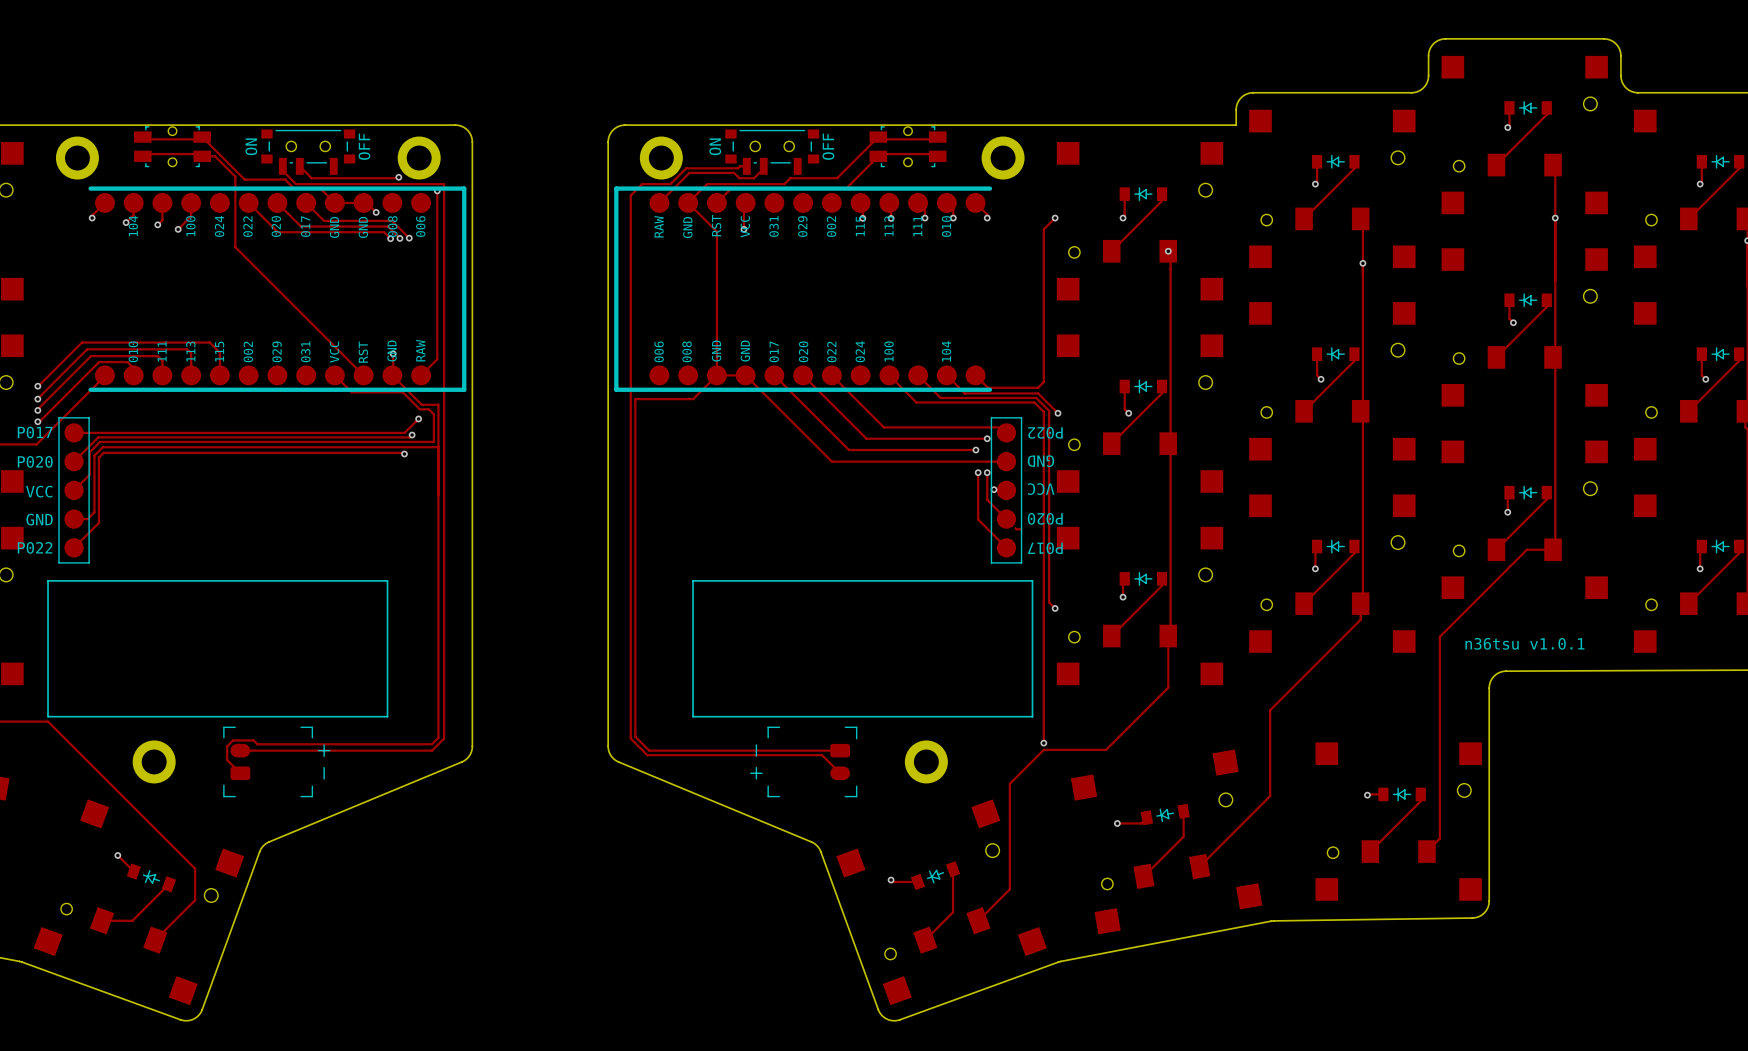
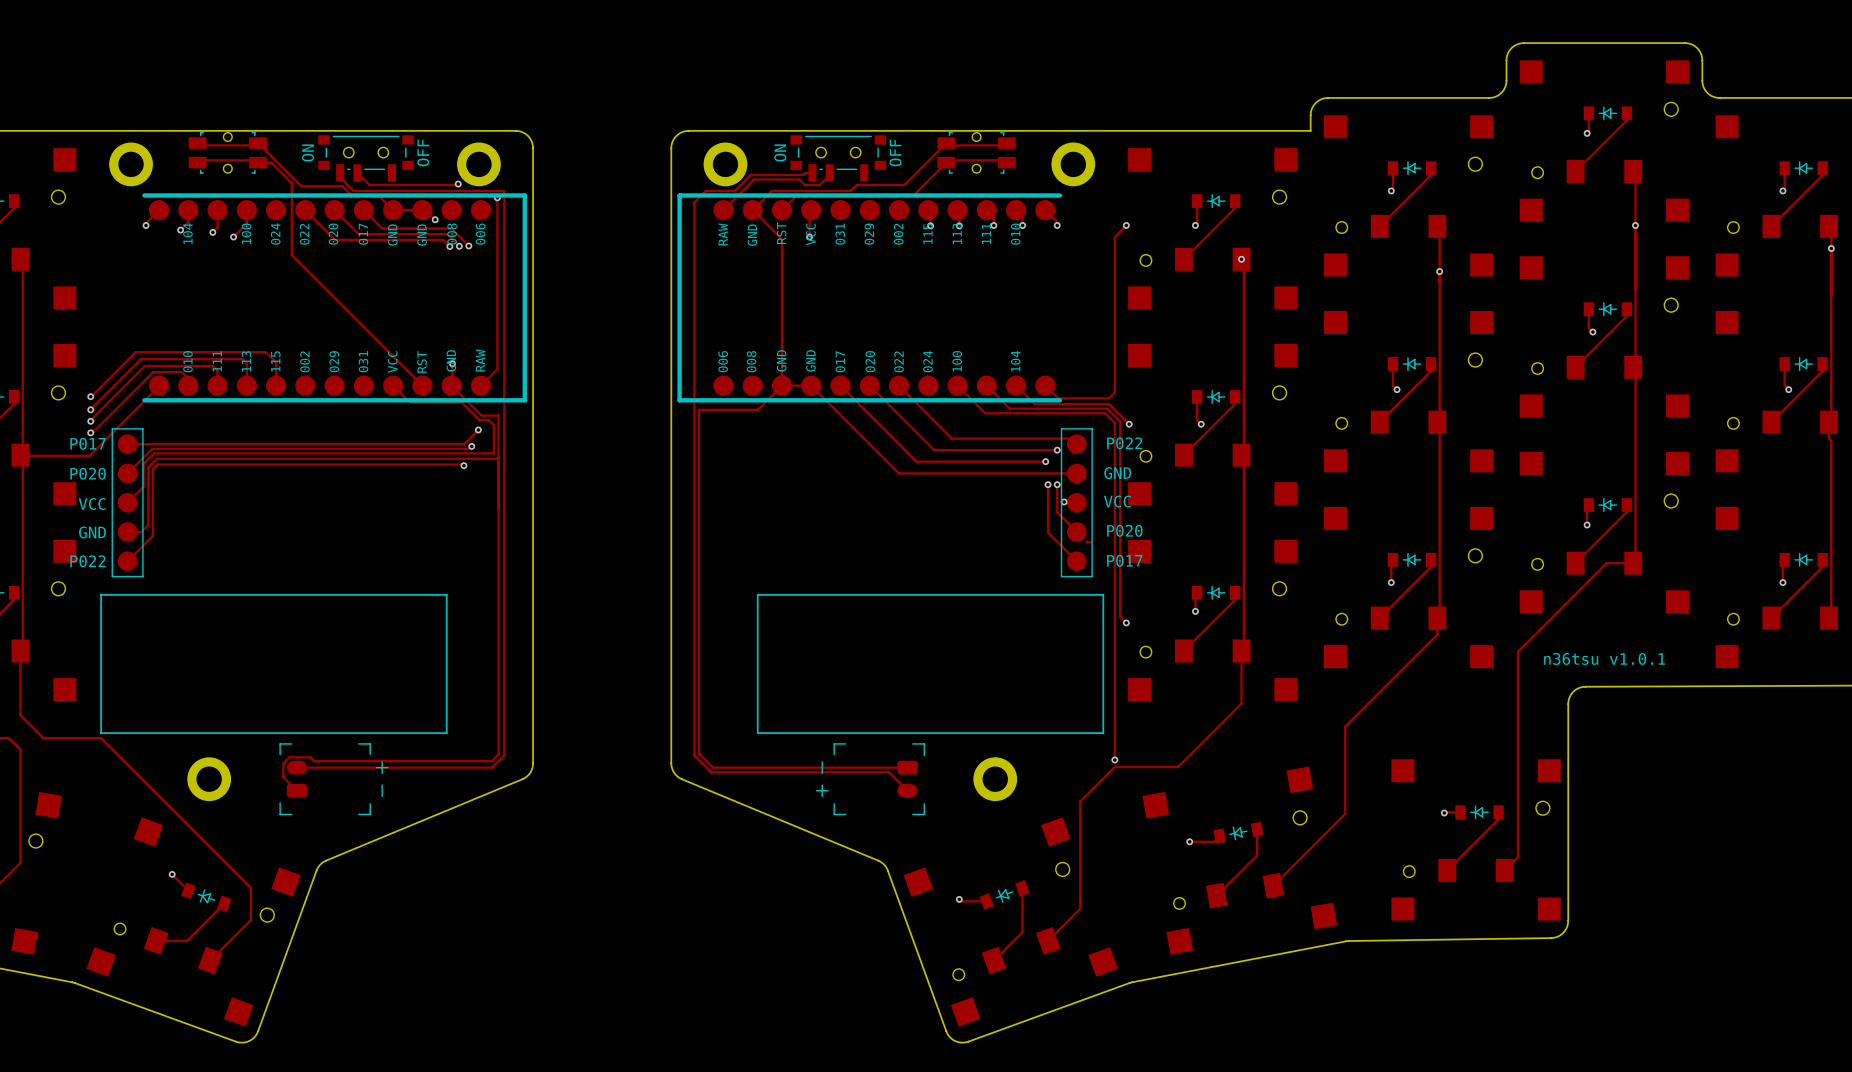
part text rotation: 0° (1045, 432) -> 180° (1124, 443)
part text rotation: 0° (1040, 461) -> 180° (1117, 473)
part text rotation: 0° (1041, 489) -> 180° (1117, 501)
part text rotation: 0° (1045, 518) -> 180° (1124, 530)
part text rotation: 0° (1045, 548) -> 180° (1124, 560)

